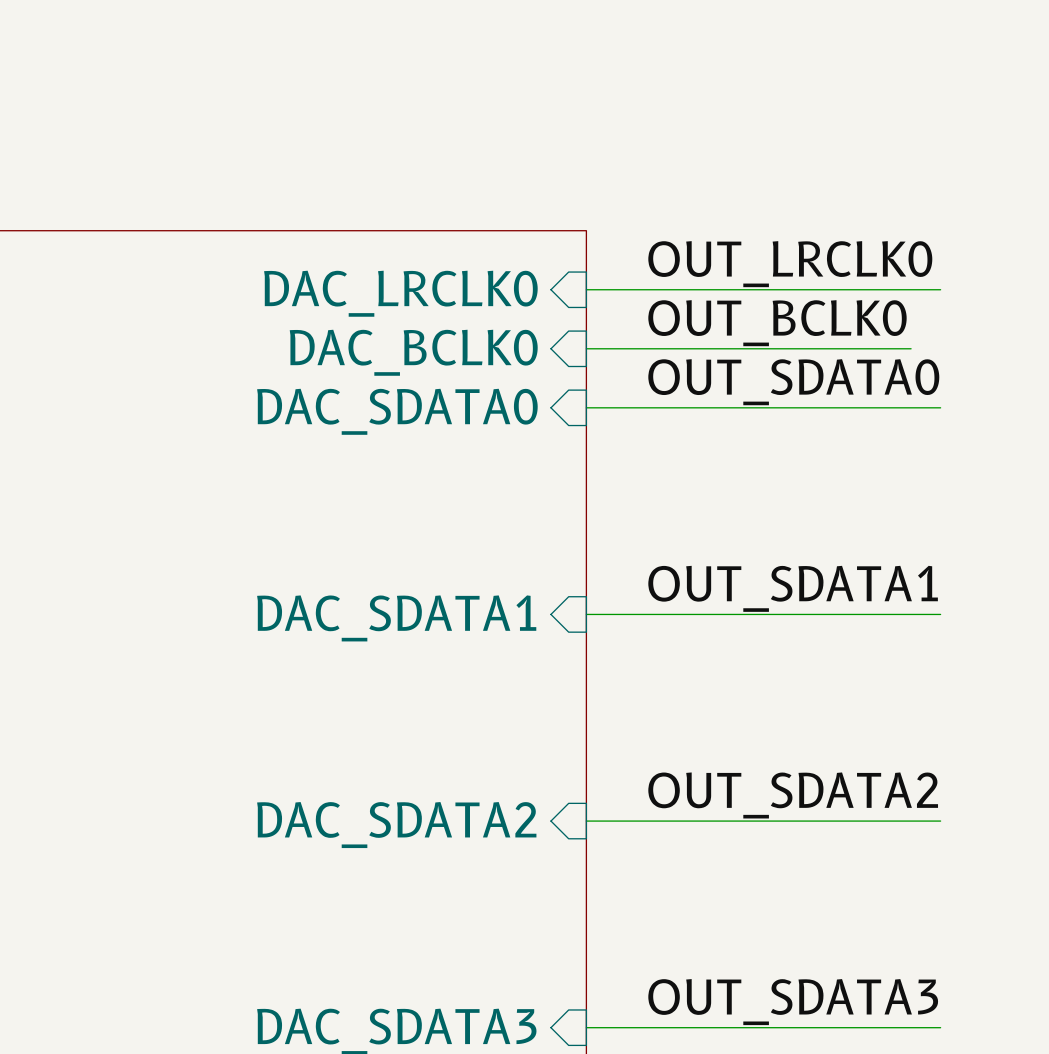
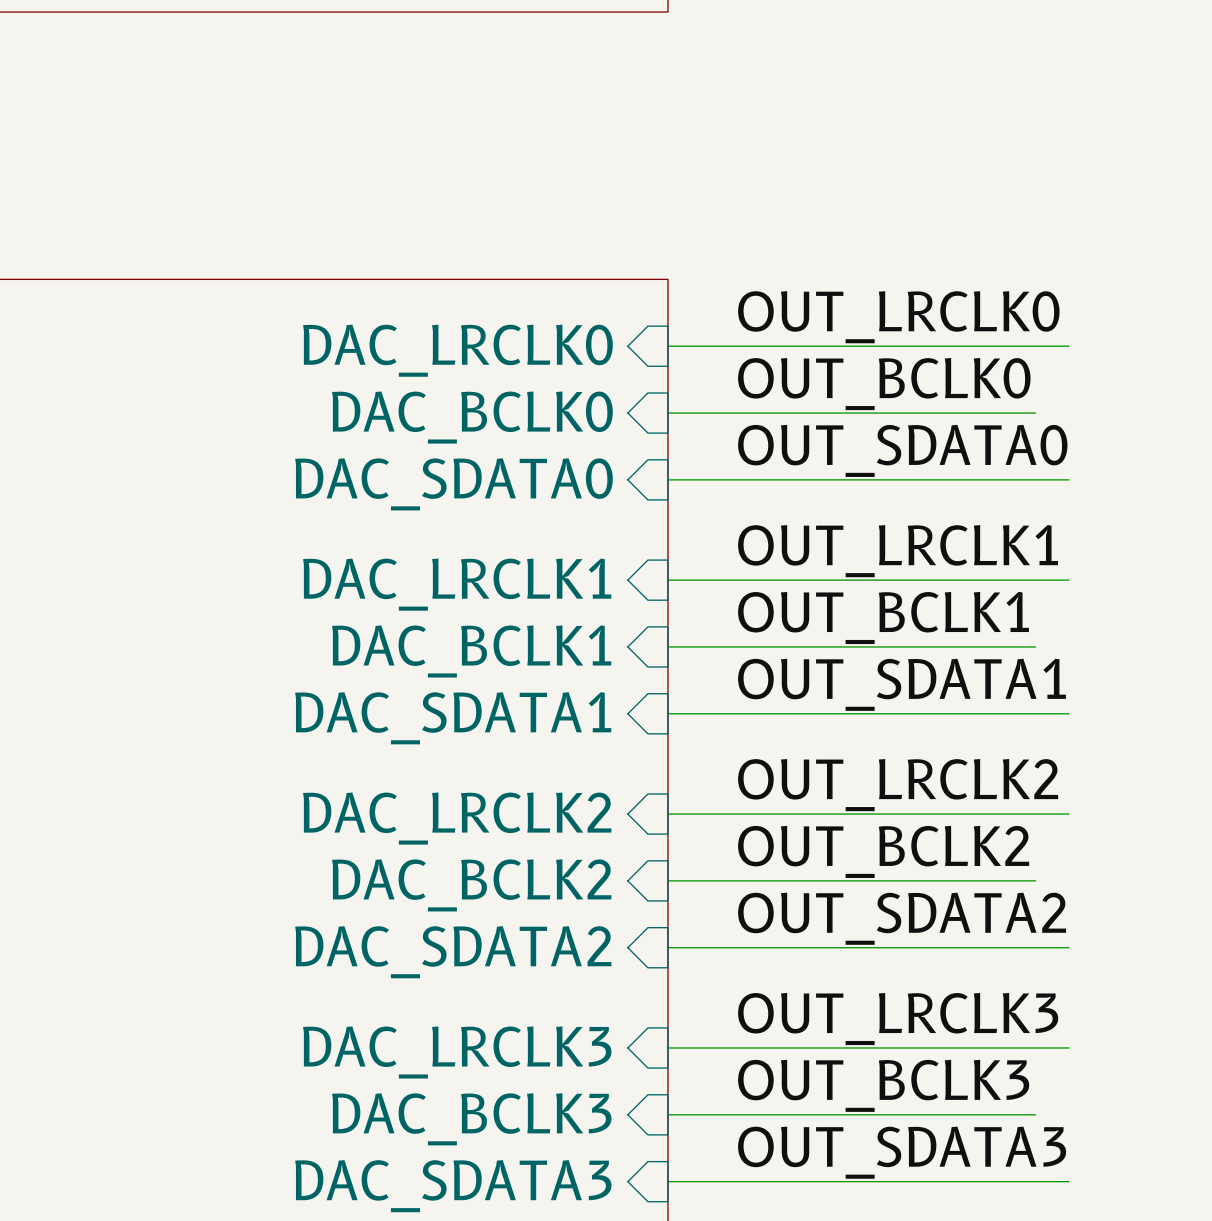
label: none -> OUT_LRCLK1 (898, 551)
wire: none -> (667, 580) (1068, 580)
sheet pin: none -> DAC_LRCLK1 (457, 584)
label: none -> OUT_BCLK1 (883, 617)
wire: none -> (667, 646) (1035, 646)
sheet pin: none -> DAC_BCLK1 (471, 651)
label: none -> OUT_LRCLK2 (898, 785)
wire: none -> (667, 814) (1068, 814)
sheet pin: none -> DAC_LRCLK2 (457, 818)
label: none -> OUT_BCLK2 (883, 851)
wire: none -> (667, 880) (1035, 880)
sheet pin: none -> DAC_BCLK2 (471, 885)
label: none -> OUT_LRCLK3 (898, 1019)
wire: none -> (667, 1047) (1068, 1047)
sheet pin: none -> DAC_LRCLK3 (457, 1052)
label: none -> OUT_BCLK3 (883, 1085)
wire: none -> (667, 1114) (1035, 1114)
sheet pin: none -> DAC_BCLK3 (471, 1119)

